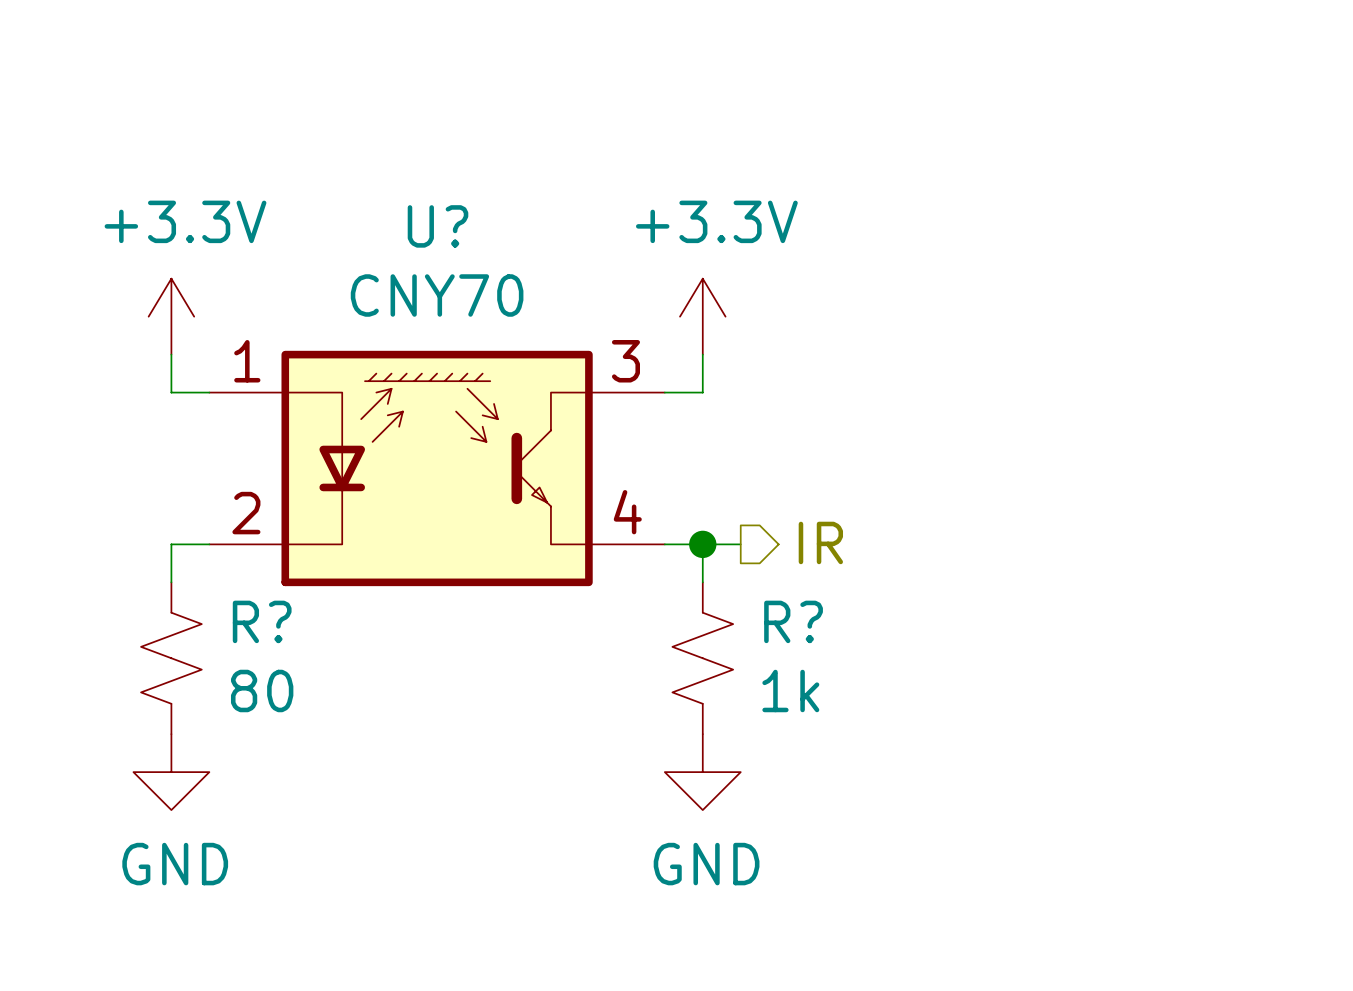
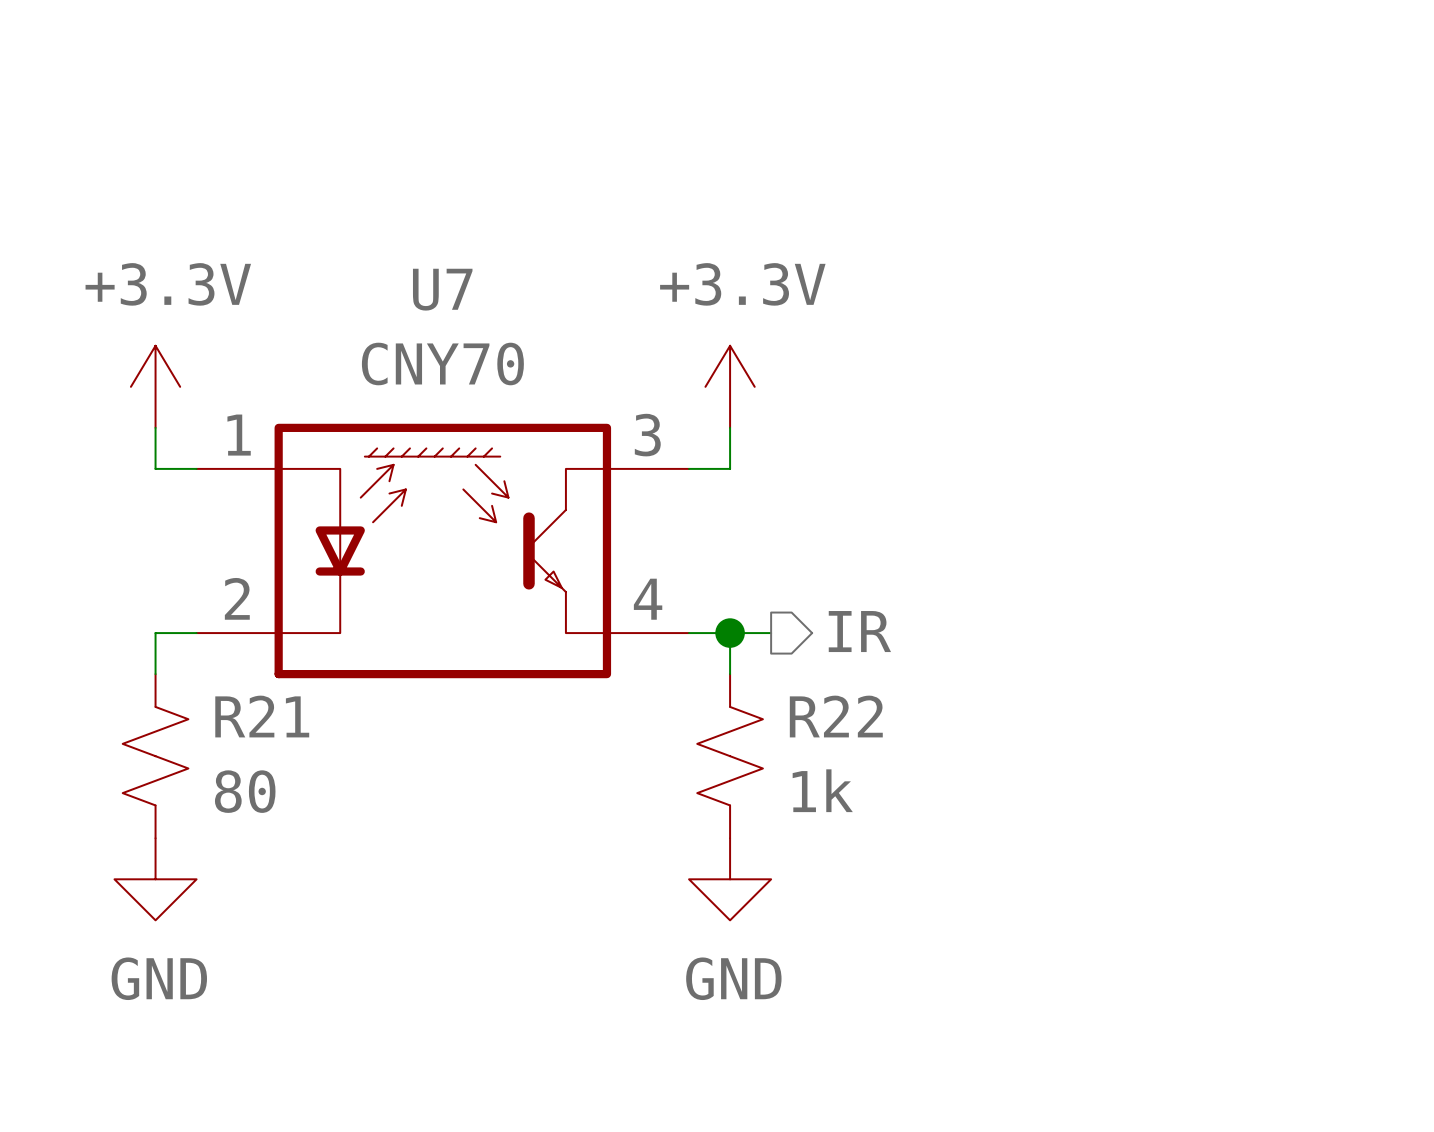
U? name: U? (438, 226) -> U7 (442, 289)
R? name: R? (262, 621) -> R21 (262, 716)
R? name: R? (793, 621) -> R22 (836, 716)

